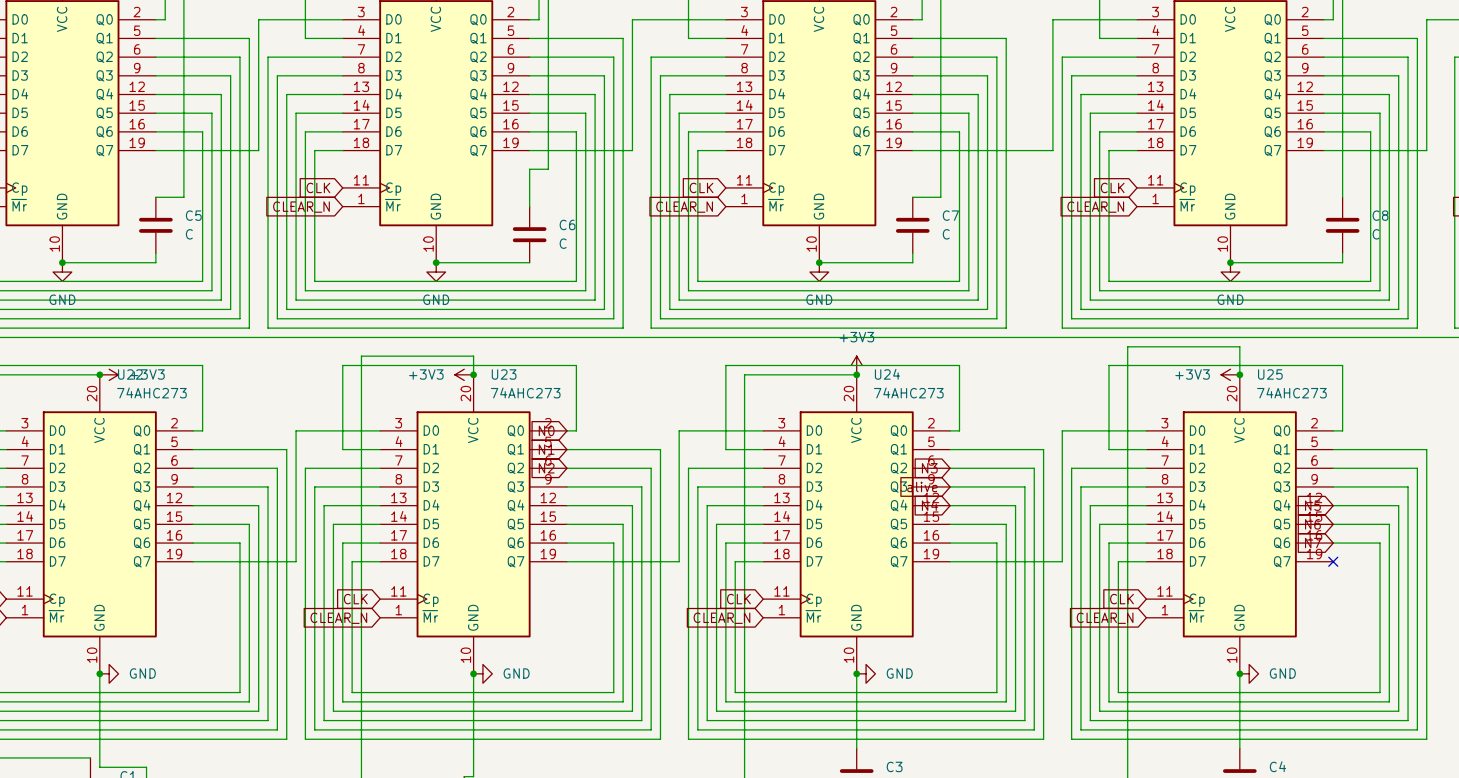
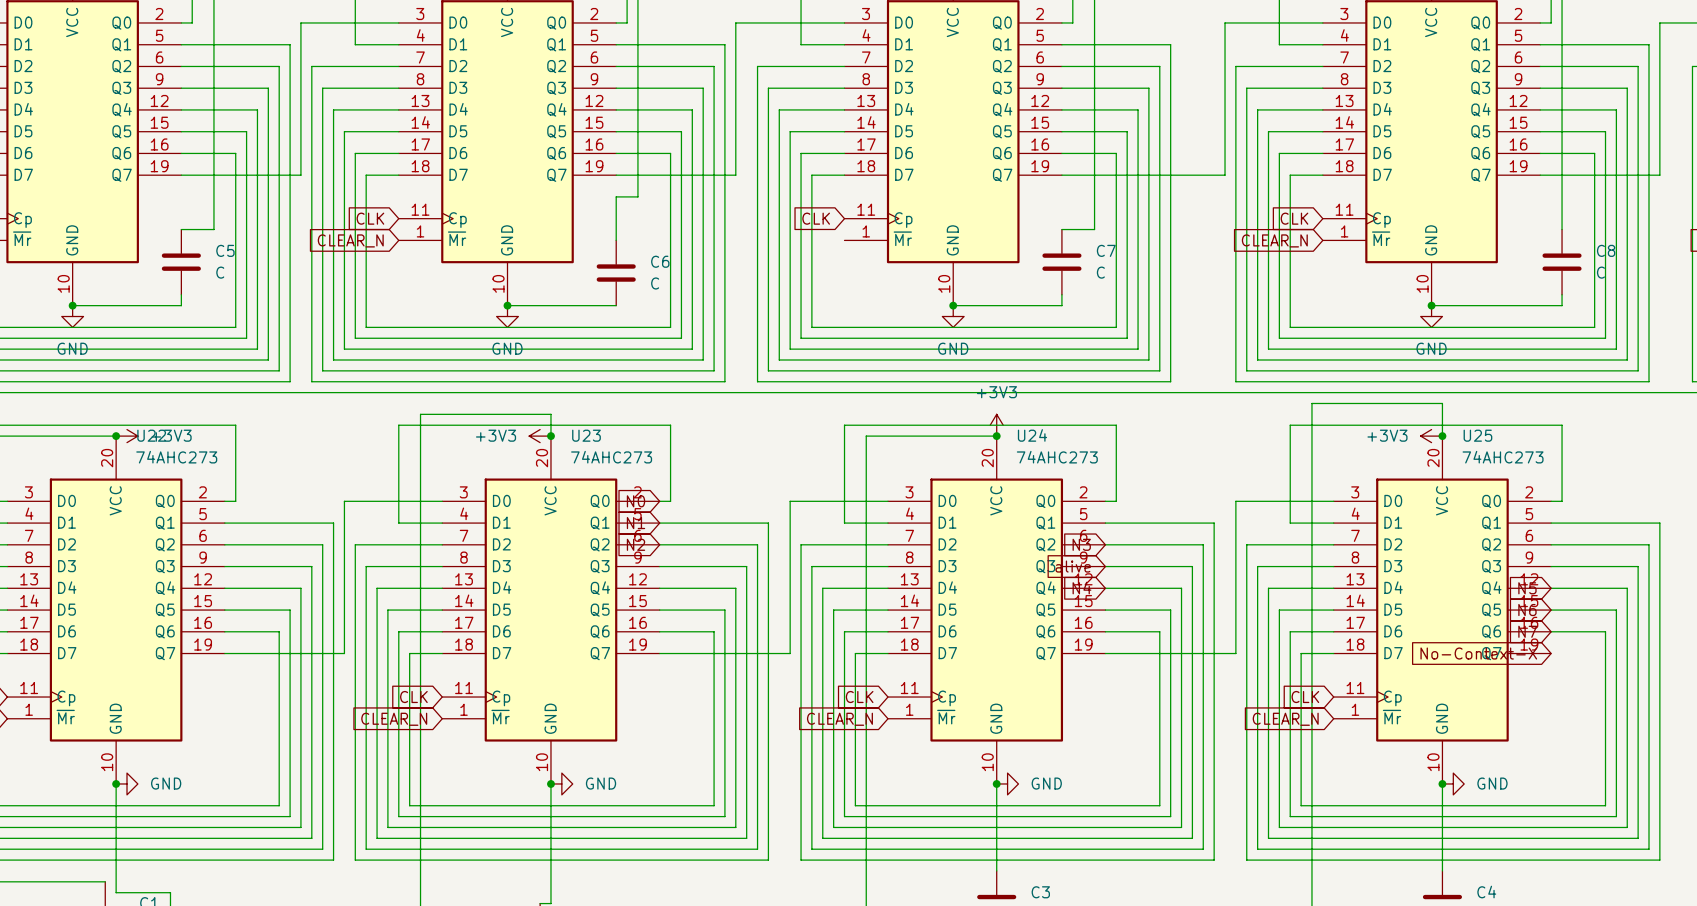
global label: CLEAR_N (684, 207) -> none
global label: none -> No-Context-X (1478, 653)
no-connect mark: (1333, 561) -> none

